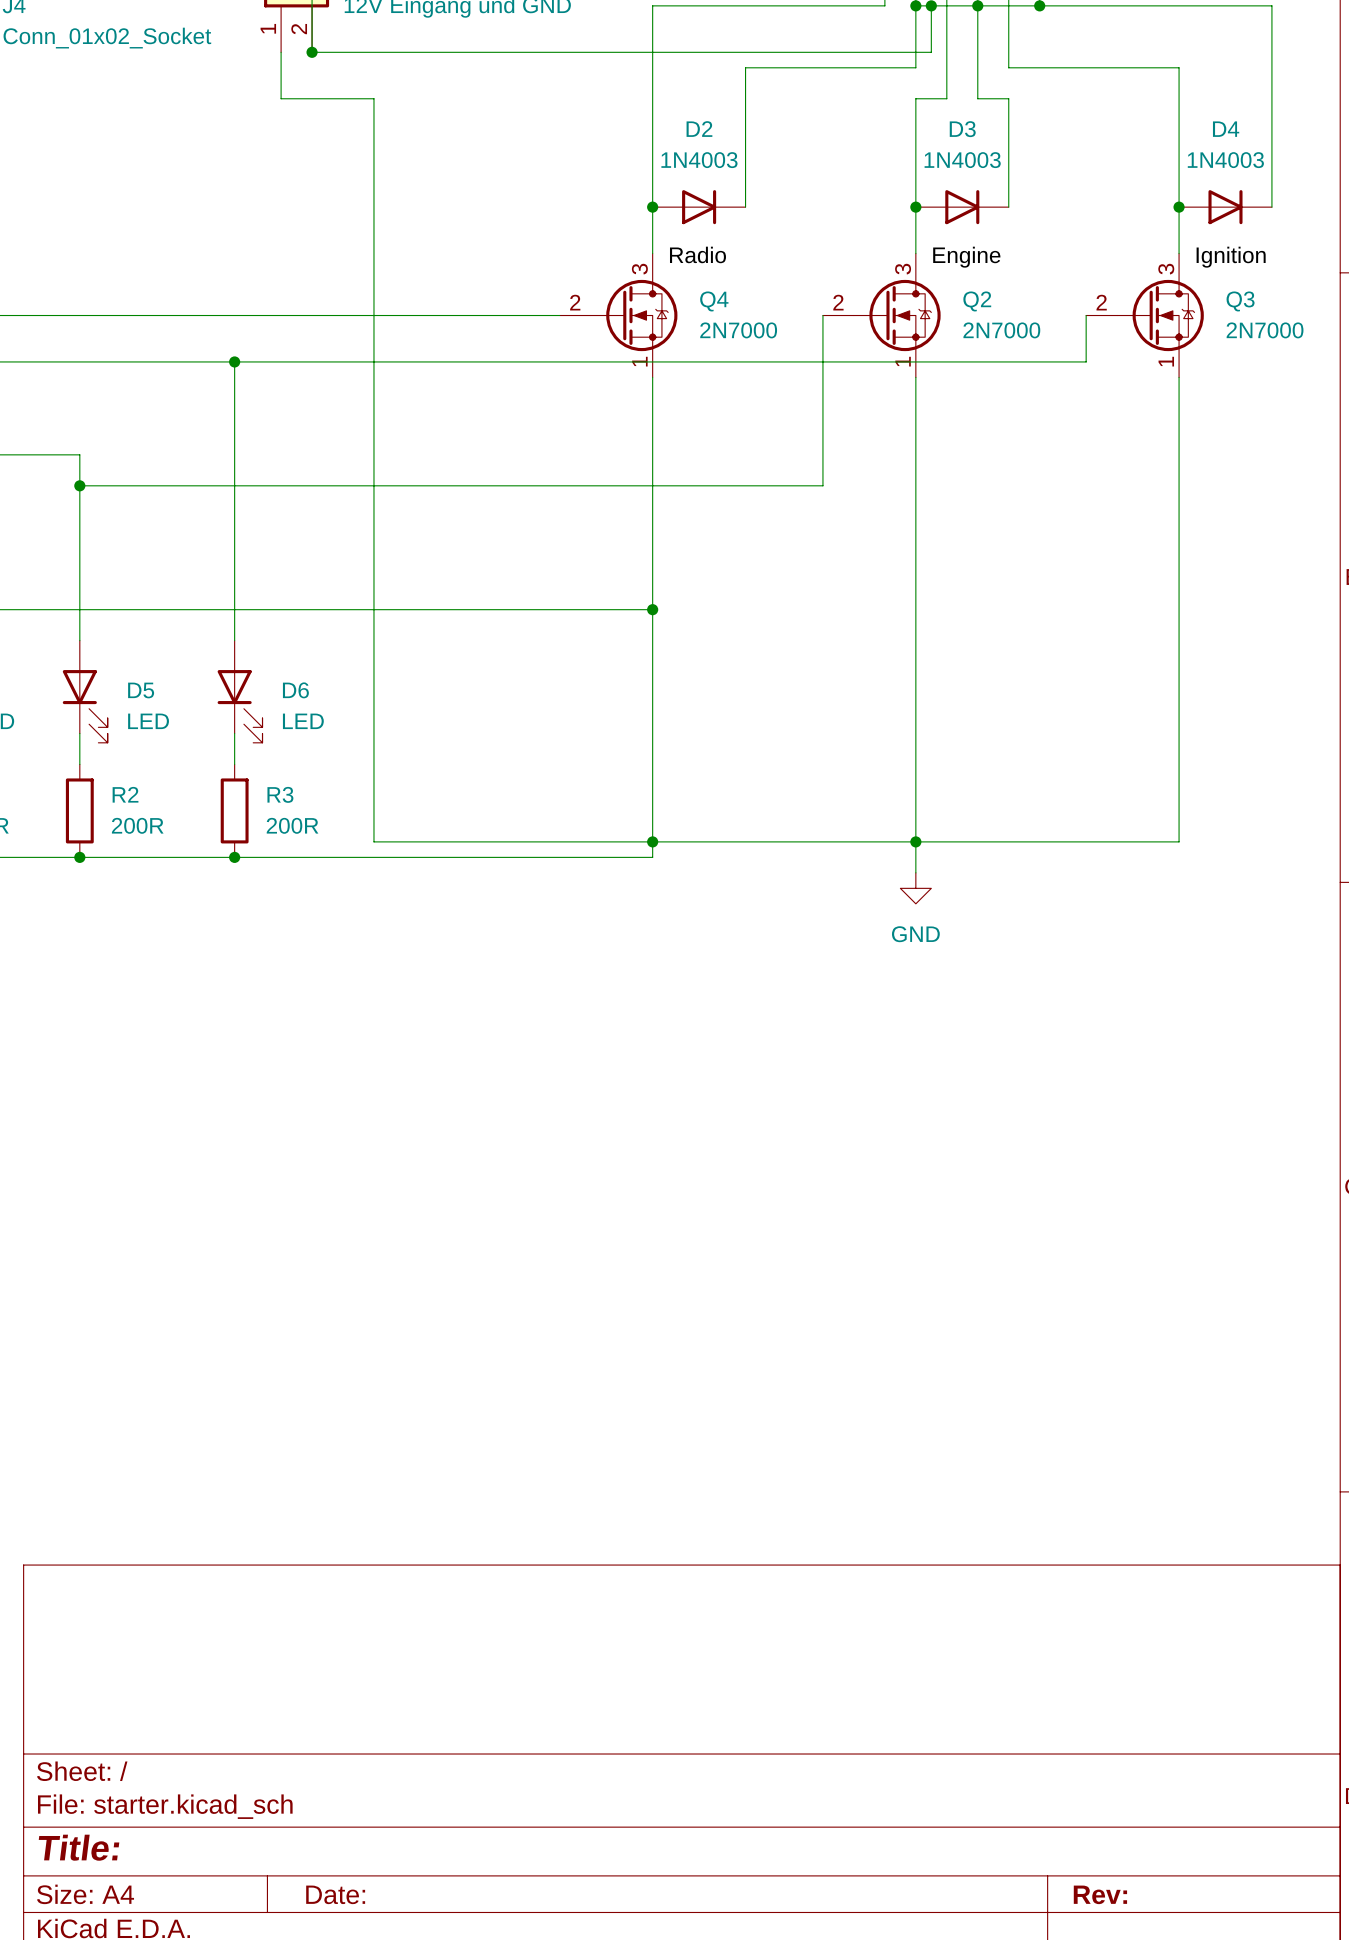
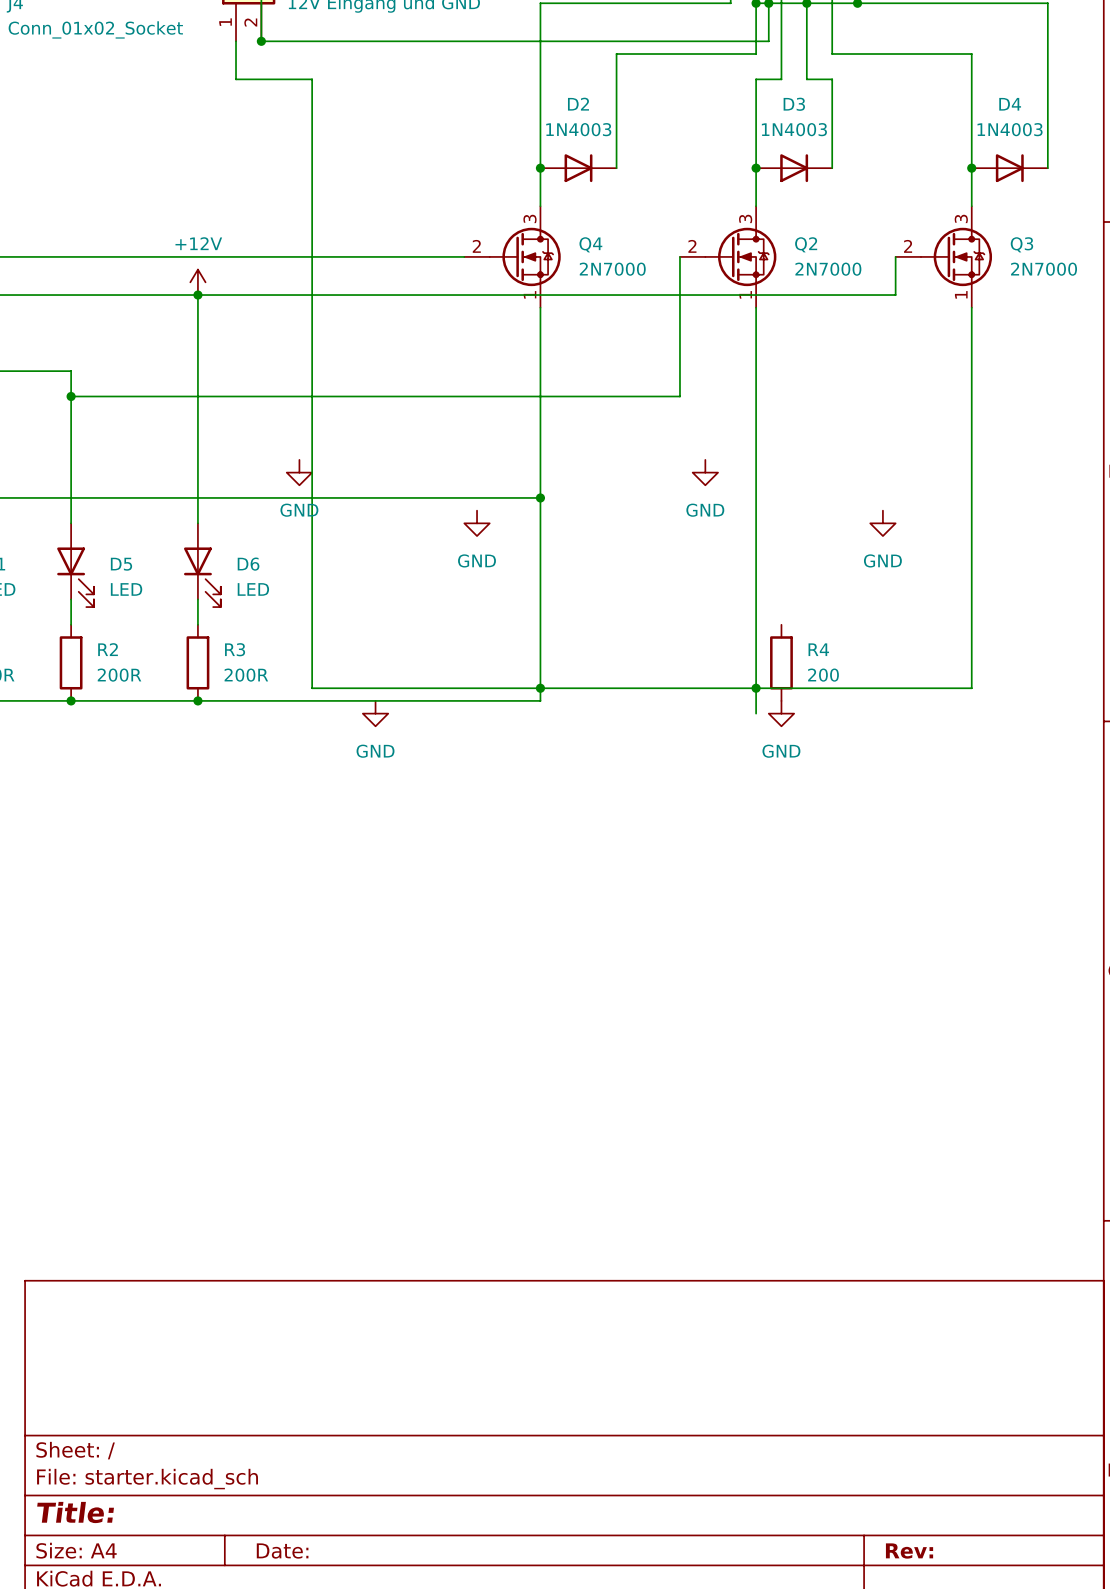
label: Radio (697, 254) -> none
label: Engine (966, 257) -> none
label: Ignition (1231, 257) -> none
power symbol: none -> +12V (197, 282)
power symbol: none -> GND (299, 472)
power symbol: none -> GND (705, 472)
power symbol: none -> GND (477, 523)
power symbol: none -> GND (882, 523)
R4: none -> 200 (781, 662)
power symbol: none -> GND (375, 713)
power symbol position: GND (915, 888) -> GND (781, 713)

